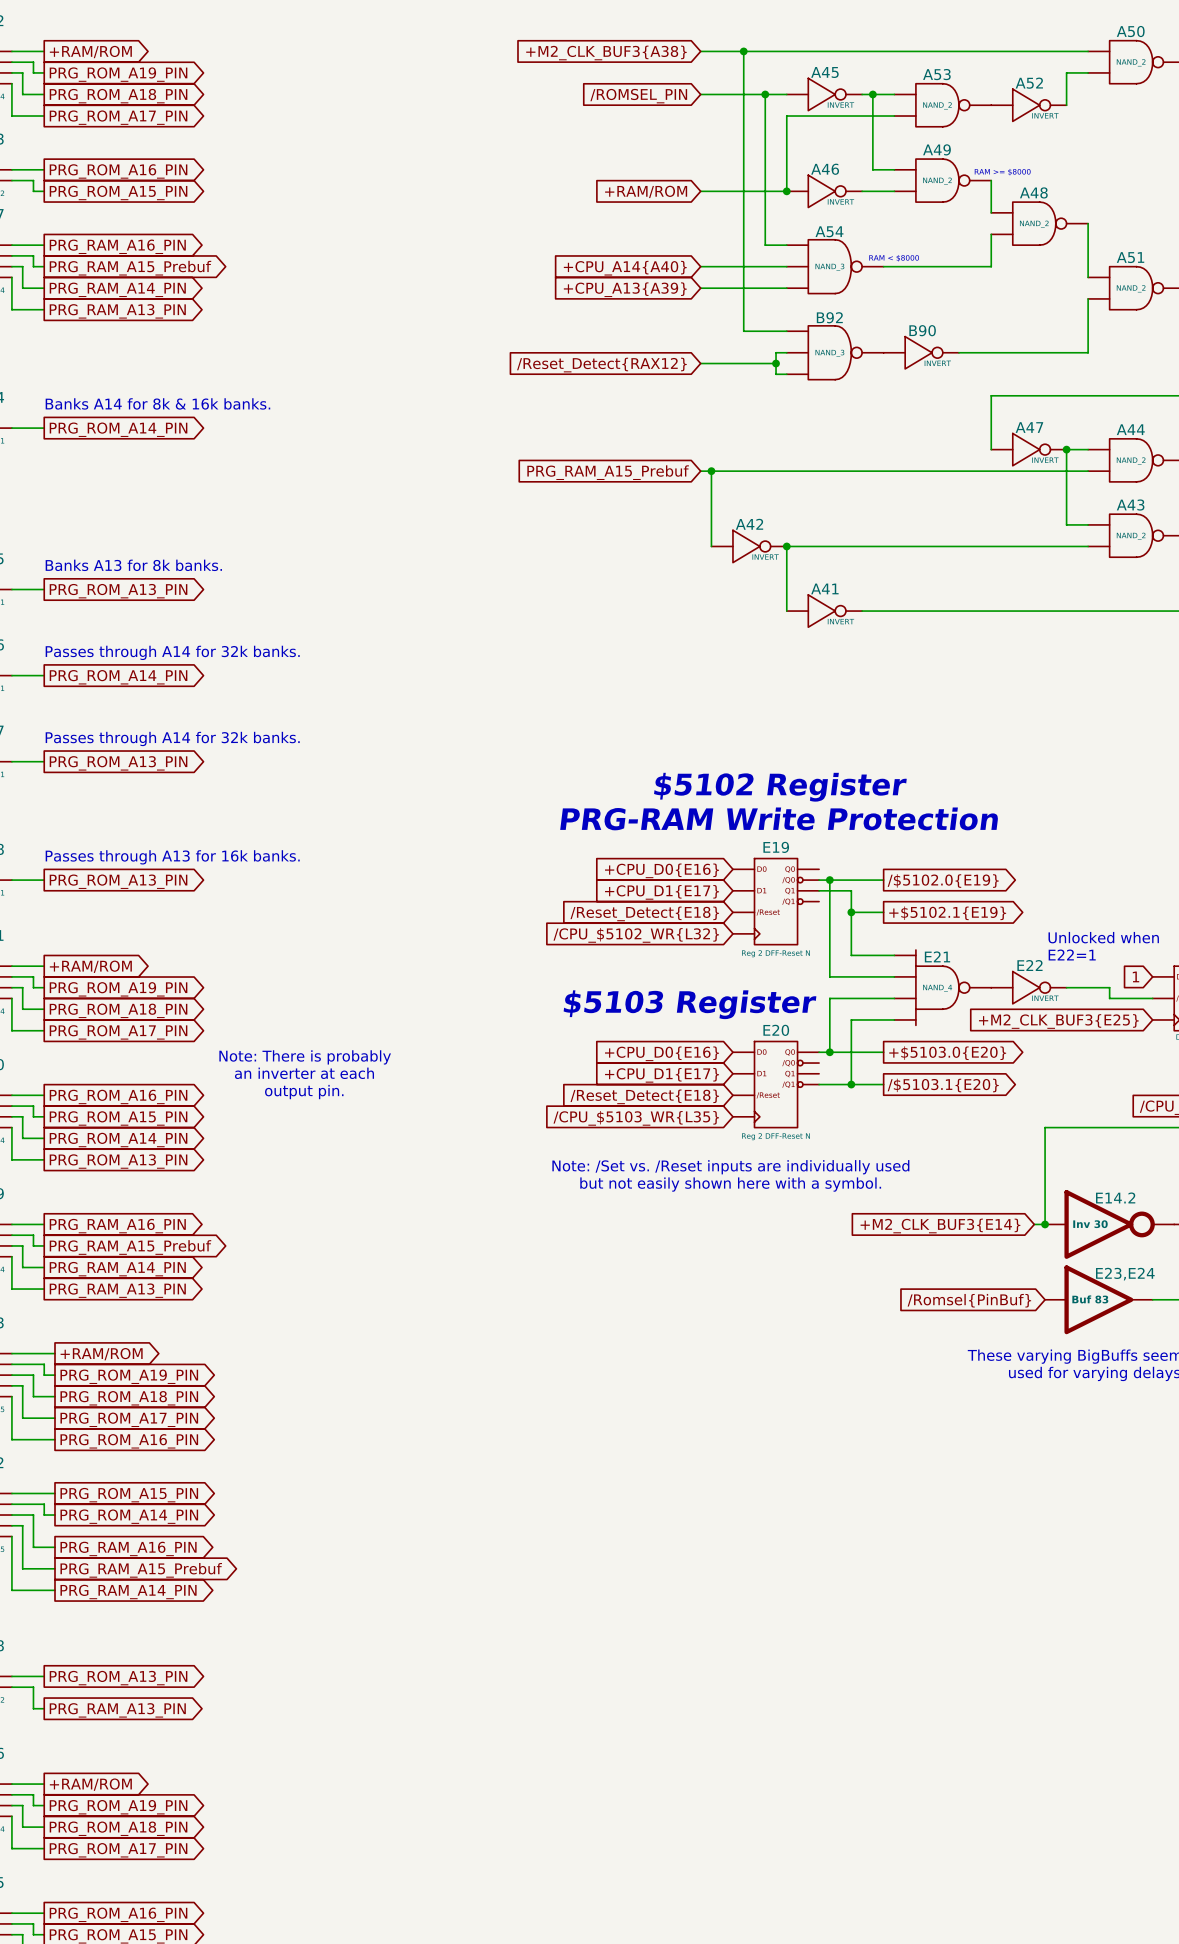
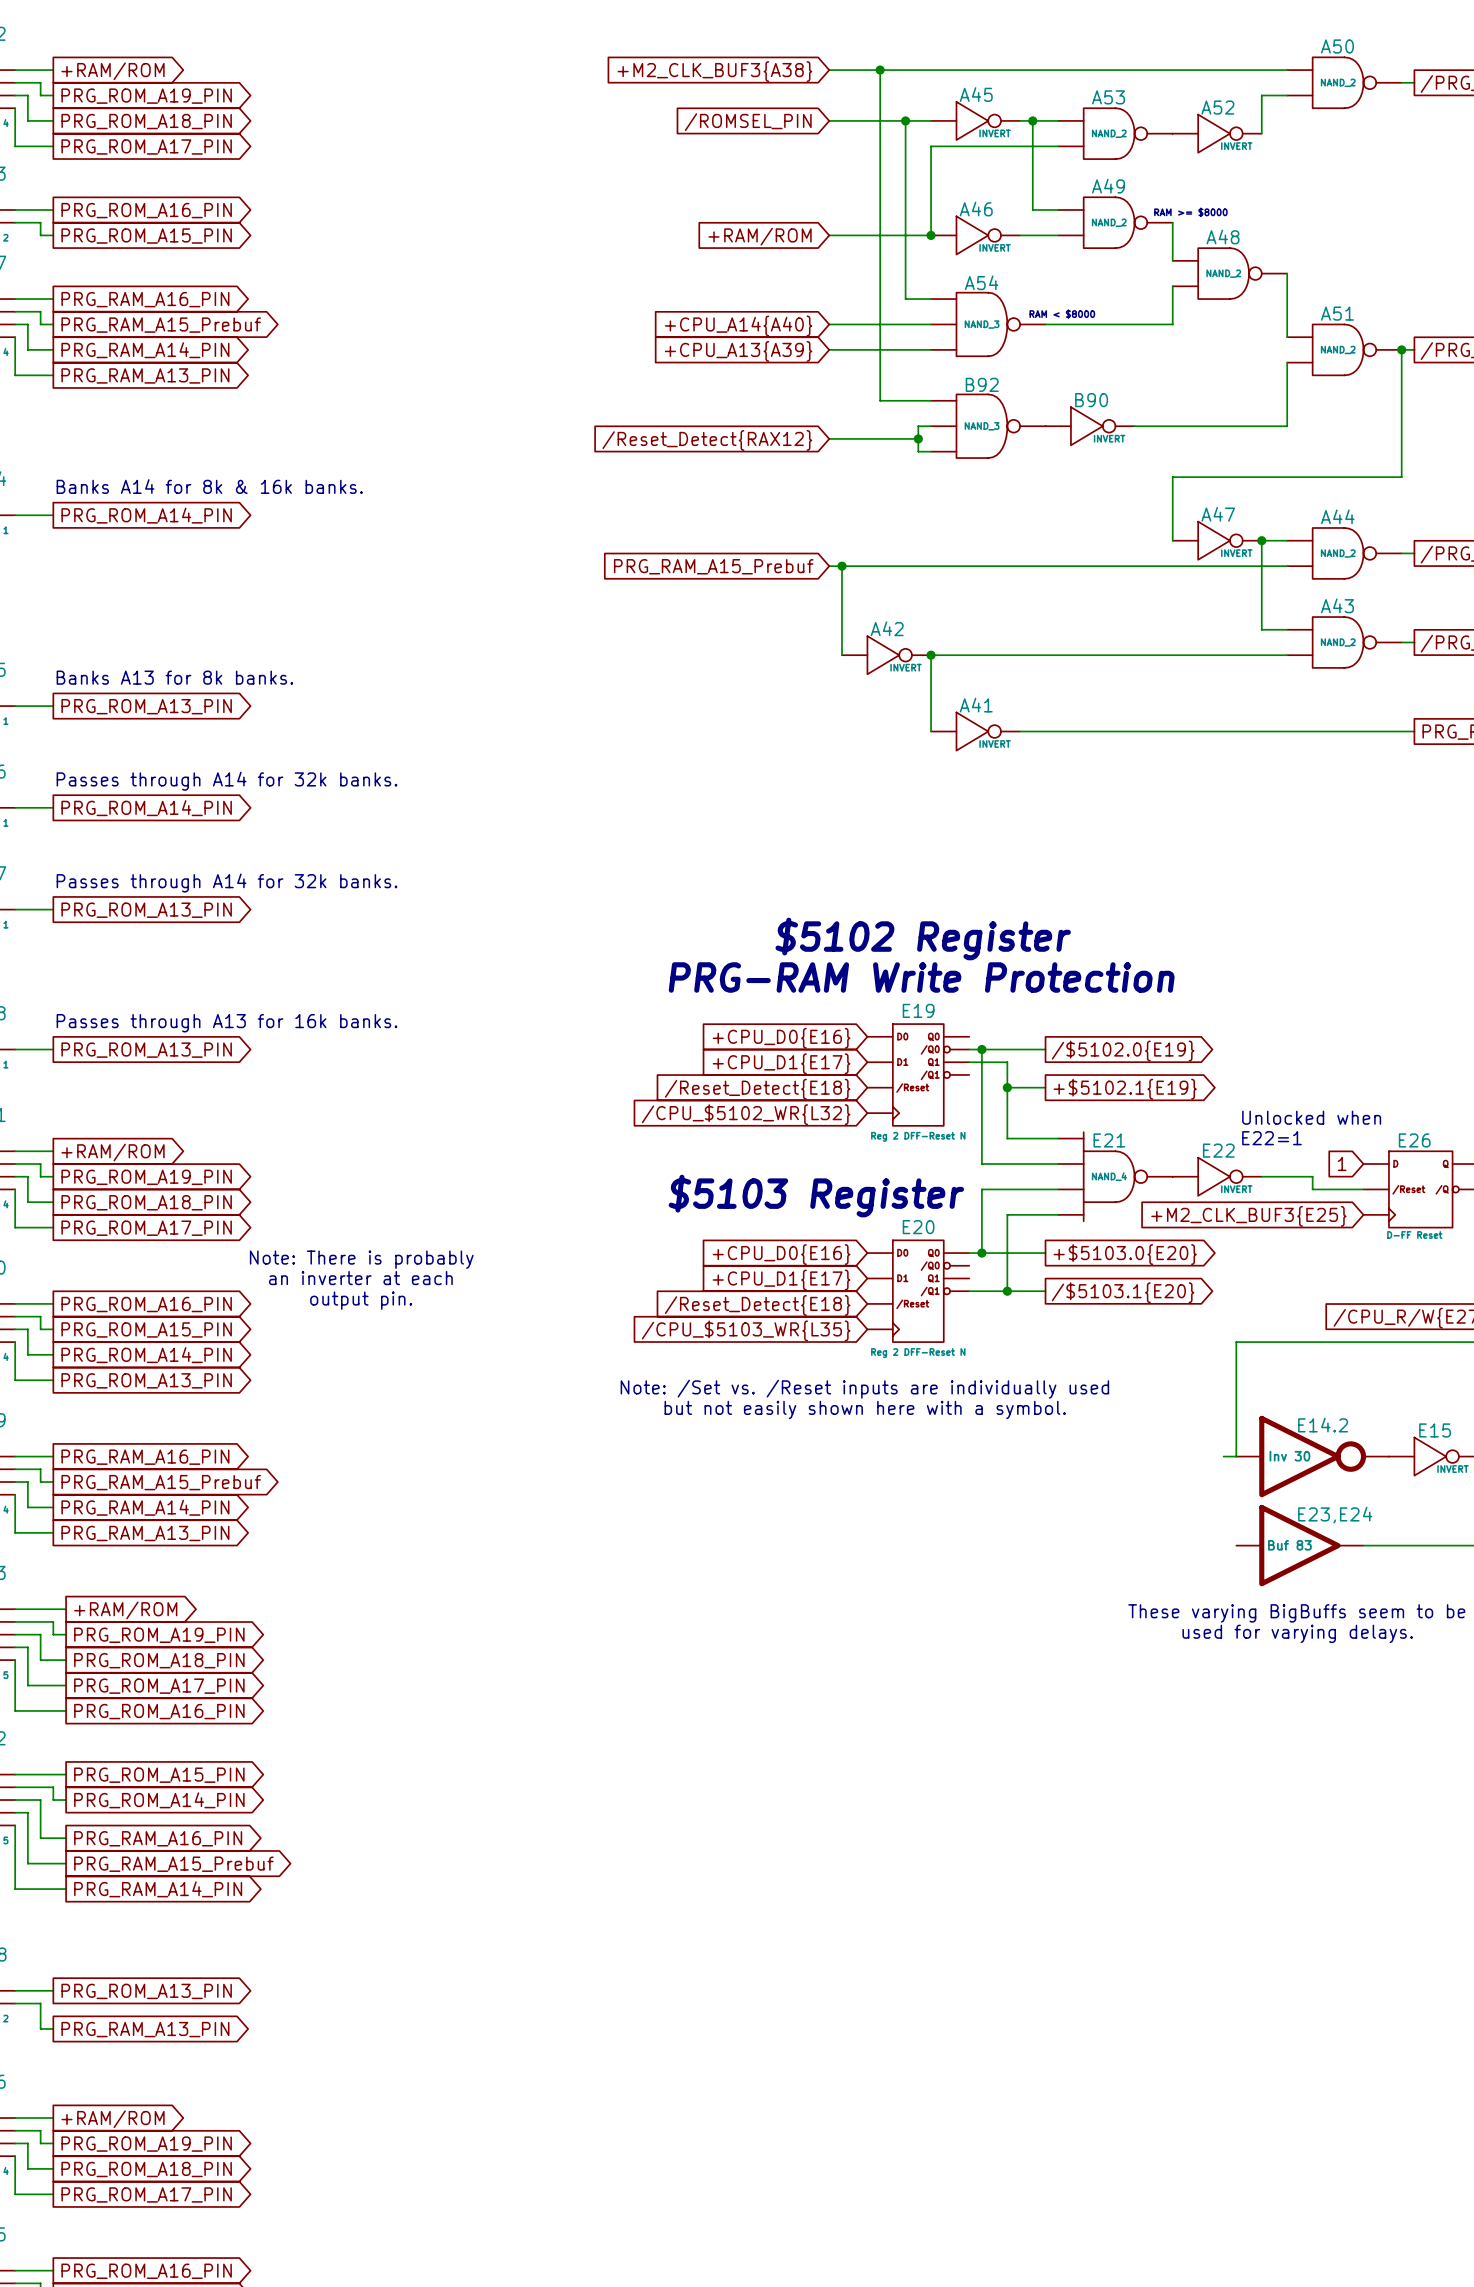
junction: (1045, 1224) -> none
global label: +M2_CLK_BUF3{E14} (940, 1225) -> none
global label: /Romsel{PinBuf} (969, 1300) -> none

